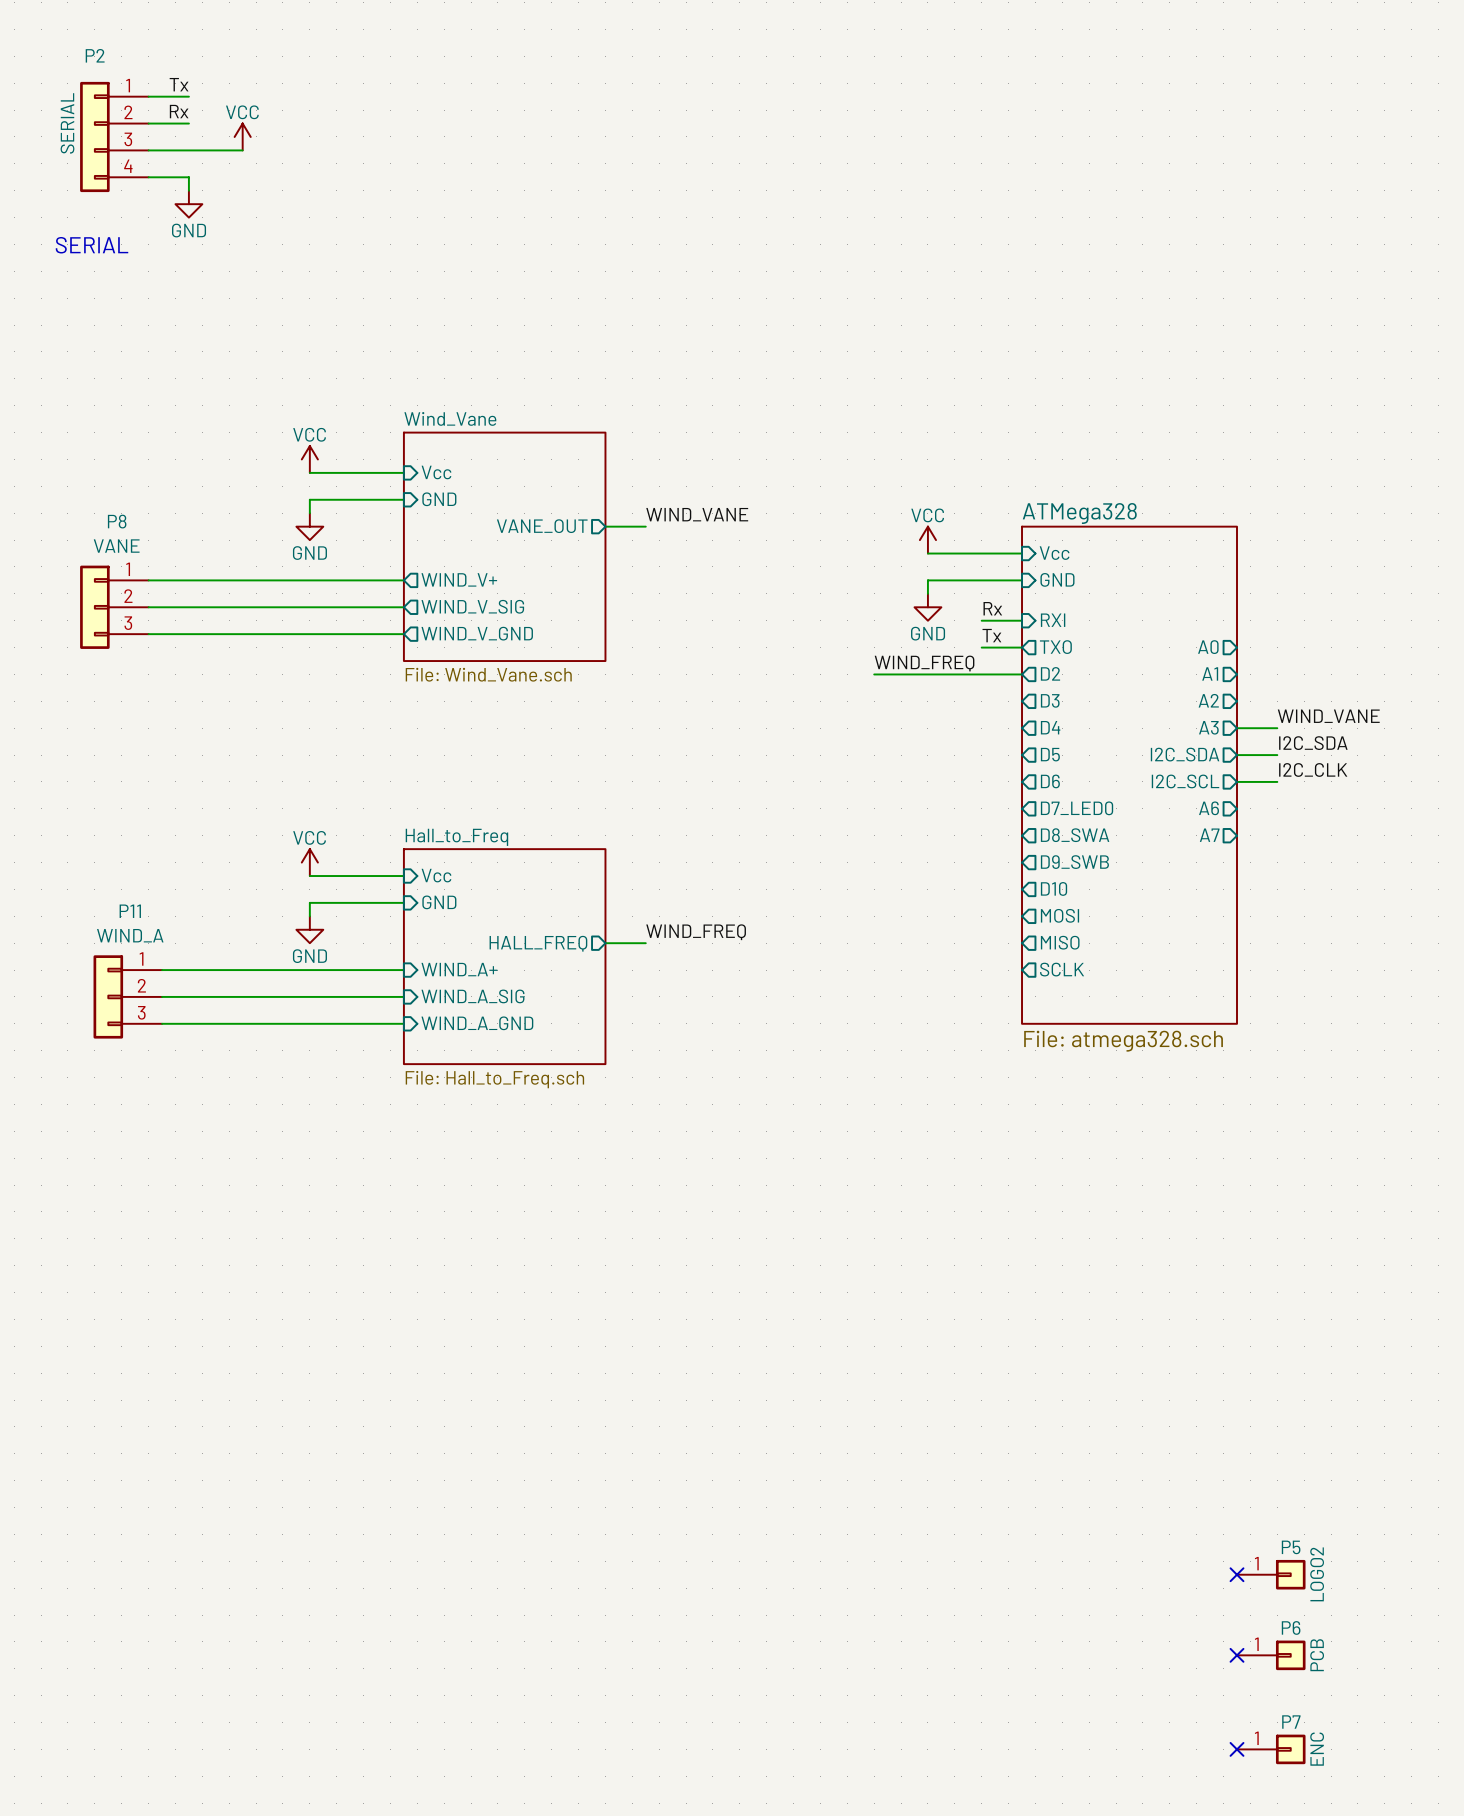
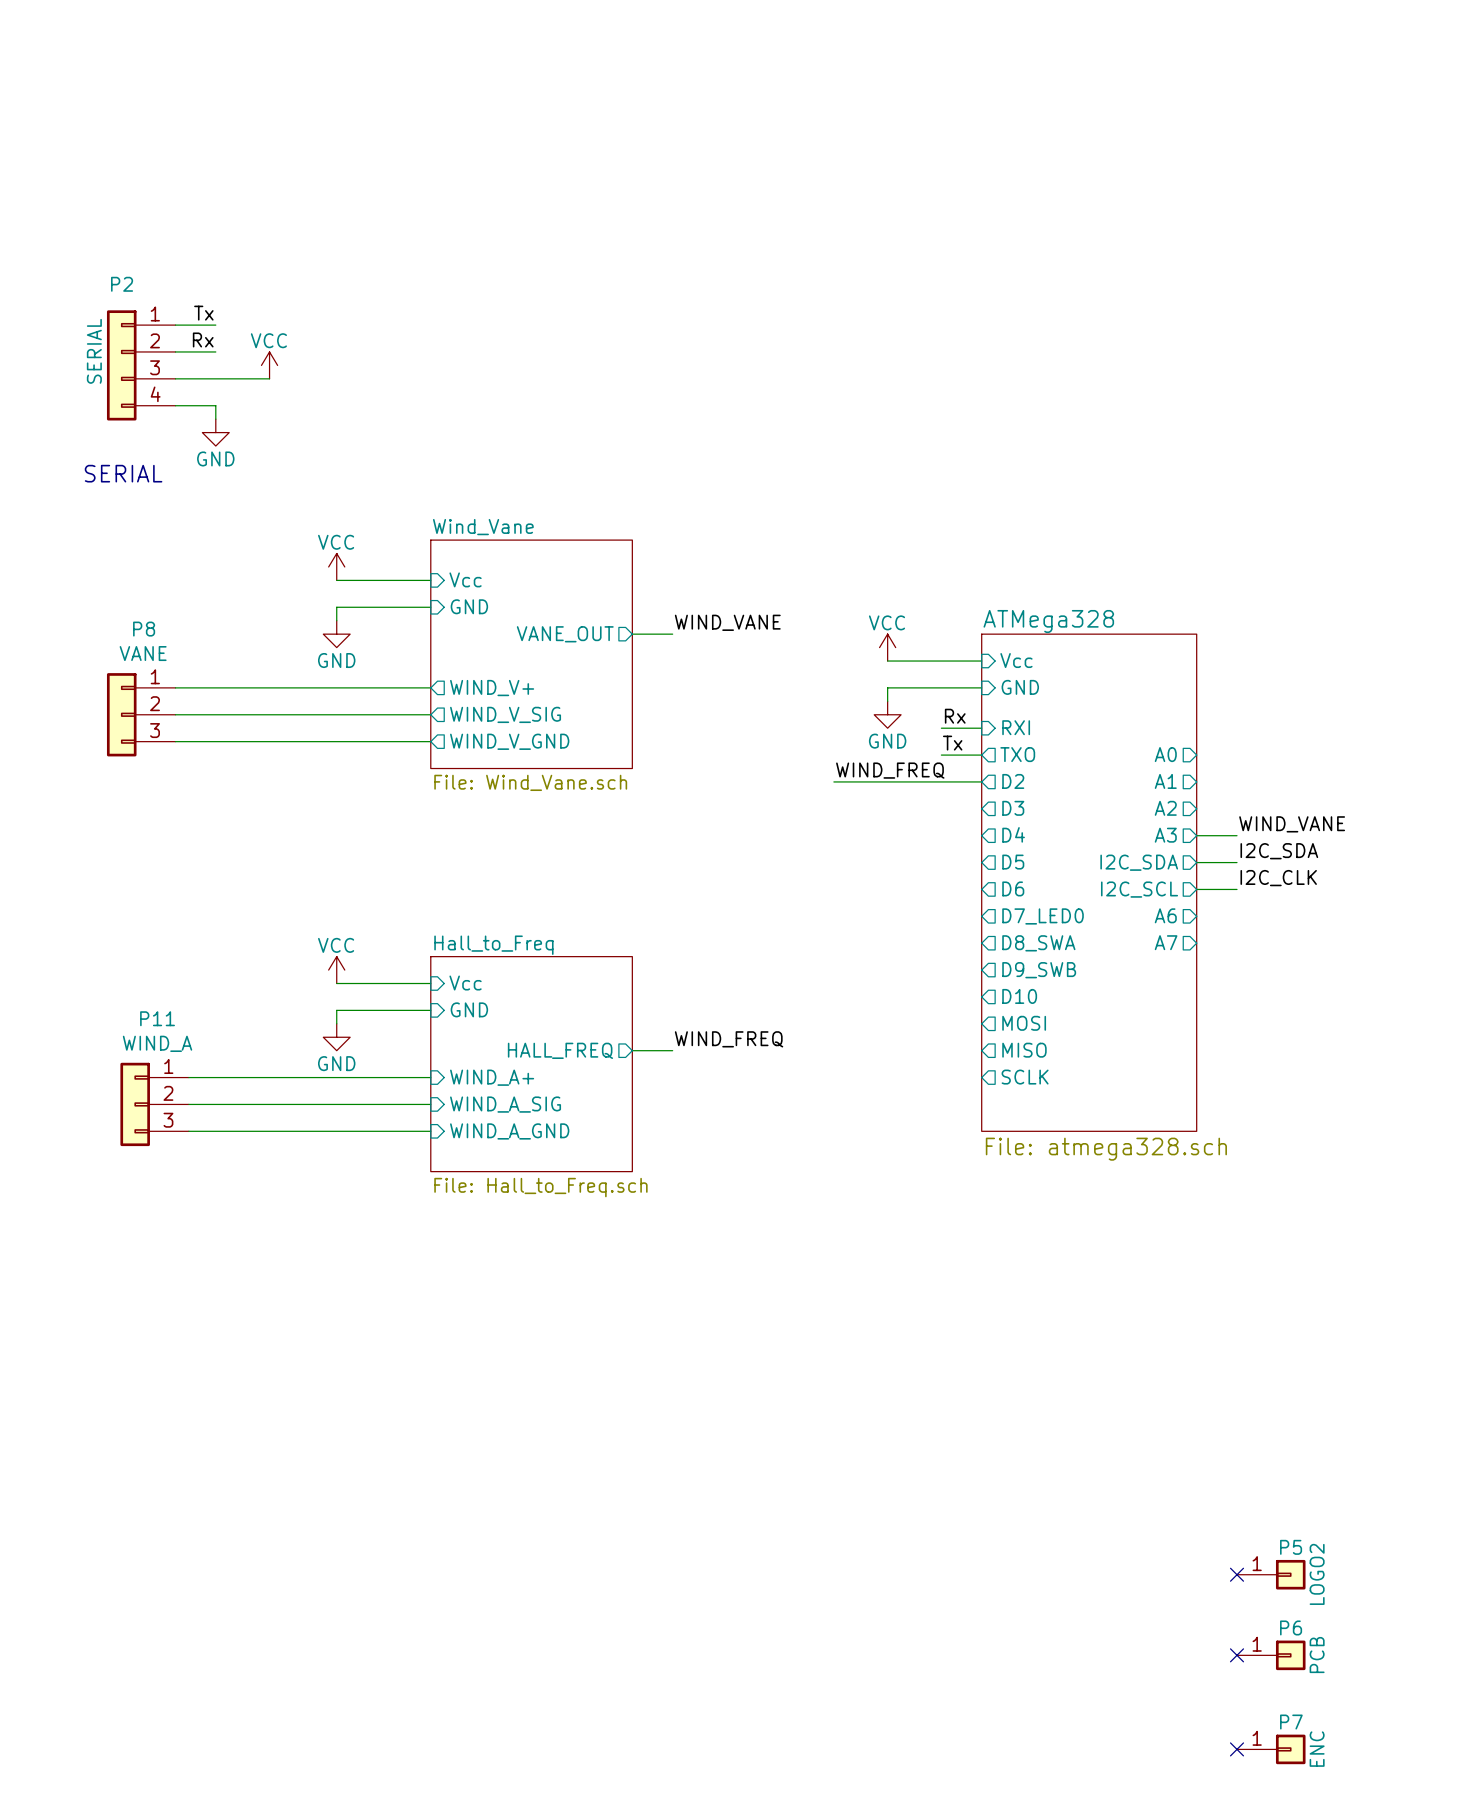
label position: Tx (179, 84) -> Tx (203, 313)
wire: (148, 96) (188, 96) -> (175, 325) (215, 325)
label position: Rx (179, 111) -> Rx (203, 339)
wire: (148, 123) (188, 123) -> (175, 351) (215, 351)
P2 position: (114, 136) -> (141, 365)
power symbol: VCC (242, 136) -> none
wire: (148, 150) (242, 150) -> (175, 378) (269, 378)
wire: (148, 177) (188, 177) (188, 190) -> (175, 405) (215, 405) (215, 419)
power symbol: GND (188, 204) -> none
text position: SERIAL (92, 245) -> SERIAL (123, 473)
power symbol: none -> VCC (269, 365)
power symbol: none -> GND (215, 432)
power symbol: VCC (309, 459) -> none
wire: (309, 472) (403, 472) -> none
sheet pin position: Vcc (436, 472) -> Vcc (465, 579)
wire: (403, 499) (309, 499) (309, 513) -> none
sheet pin position: GND (439, 499) -> GND (469, 606)
label position: WIND_VANE (697, 514) -> WIND_VANE (727, 622)
power symbol: GND (309, 526) -> none
sheet pin position: VANE_OUT (542, 526) -> VANE_OUT (565, 634)
wire: (605, 526) (645, 526) -> (632, 634) (672, 634)
power symbol position: VCC (927, 540) -> VCC (887, 647)
sheet Wind_Vane position: (504, 546) -> (531, 654)
wire: (927, 553) (1022, 553) -> (887, 661) (981, 661)
sheet pin position: Vcc (1054, 553) -> Vcc (1016, 660)
power symbol: none -> VCC (336, 566)
sheet pin position: WIND_V+ (459, 579) -> WIND_V+ (492, 688)
sheet pin position: GND (1057, 579) -> GND (1020, 687)
wire: (148, 580) (336, 580) -> none
wire: none -> (403, 580) (430, 580)
wire: (1022, 580) (927, 580) (927, 593) -> (981, 687) (887, 687) (887, 701)
sheet pin position: WIND_V_SIG (472, 606) -> WIND_V_SIG (505, 714)
P8 position: (114, 607) -> (141, 714)
wire: (148, 607) (336, 607) -> (336, 620) (336, 607)
wire: none -> (403, 607) (430, 607)
power symbol position: GND (927, 607) -> GND (887, 714)
label position: Rx (992, 608) -> Rx (955, 716)
wire: (981, 620) (1022, 620) -> (941, 728) (981, 728)
sheet pin position: RXI (1053, 620) -> RXI (1016, 727)
sheet pin position: WIND_V_GND (477, 633) -> WIND_V_GND (509, 741)
wire: (148, 634) (403, 634) -> (175, 741) (430, 741)
power symbol: none -> GND (336, 634)
label position: Tx (991, 635) -> Tx (952, 743)
wire: (981, 647) (1022, 647) -> (941, 755) (981, 755)
sheet pin position: TXO (1055, 647) -> TXO (1017, 754)
sheet pin position: A0 (1208, 647) -> A0 (1165, 754)
label position: WIND_FREQ (924, 663) -> WIND_FREQ (890, 770)
sheet pin position: D2 (1050, 673) -> D2 (1013, 781)
sheet pin position: A1 (1210, 673) -> A1 (1165, 781)
wire: (874, 674) (1022, 674) -> (833, 781) (981, 781)
wire: none -> (175, 687) (430, 687)
sheet pin position: D3 (1050, 700) -> D3 (1013, 808)
sheet pin position: A2 (1208, 700) -> A2 (1165, 808)
wire: none -> (175, 714) (430, 714)
label position: WIND_VANE (1328, 716) -> WIND_VANE (1292, 824)
sheet pin position: D4 (1050, 727) -> D4 (1013, 834)
sheet pin position: A3 (1208, 727) -> A3 (1165, 835)
wire: (1237, 728) (1277, 728) -> (1196, 835) (1237, 835)
label position: I2C_SDA (1313, 743) -> I2C_SDA (1279, 851)
sheet pin position: D5 (1050, 754) -> D5 (1013, 862)
sheet pin position: I2C_SDA (1185, 754) -> I2C_SDA (1139, 862)
wire: (1237, 755) (1277, 755) -> (1196, 862) (1237, 862)
label position: I2C_CLK (1313, 769) -> I2C_CLK (1278, 878)
sheet ATMega328 position: (1129, 775) -> (1089, 882)
sheet pin position: D6 (1050, 781) -> D6 (1013, 888)
sheet pin position: I2C_SCL (1185, 781) -> I2C_SCL (1139, 889)
wire: (1237, 781) (1277, 781) -> (1196, 889) (1237, 889)
sheet pin position: D7_LED0 (1077, 808) -> D7_LED0 (1043, 916)
sheet pin position: A6 (1209, 808) -> A6 (1165, 915)
sheet pin position: D8_SWA (1075, 835) -> D8_SWA (1038, 943)
sheet pin position: A7 (1209, 835) -> A7 (1166, 942)
power symbol position: VCC (309, 862) -> VCC (336, 970)
sheet pin position: D9_SWB (1074, 862) -> D9_SWB (1039, 970)
sheet pin position: Vcc (436, 875) -> Vcc (465, 983)
wire: (309, 876) (403, 876) -> (336, 983) (430, 983)
sheet pin position: D10 (1054, 888) -> D10 (1019, 996)
wire: (403, 902) (309, 902) (309, 916) -> (430, 1010) (336, 1010) (336, 1023)
sheet pin position: GND (439, 902) -> GND (469, 1009)
sheet pin position: MOSI (1060, 915) -> MOSI (1024, 1023)
power symbol position: GND (309, 929) -> GND (336, 1037)
label position: WIND_FREQ (696, 932) -> WIND_FREQ (729, 1039)
sheet pin position: MISO (1060, 942) -> MISO (1024, 1050)
sheet pin position: HALL_FREQ (538, 943) -> HALL_FREQ (560, 1050)
wire: (605, 943) (645, 943) -> (632, 1050) (672, 1050)
sheet Hall_to_Freq position: (504, 956) -> (531, 1064)
sheet pin position: WIND_A+ (459, 969) -> WIND_A+ (492, 1077)
sheet pin position: SCLK (1062, 969) -> SCLK (1025, 1077)
wire: (162, 970) (403, 970) -> (188, 1077) (430, 1077)
P11 position: (127, 996) -> (154, 1104)
wire: (162, 996) (403, 996) -> (188, 1104) (430, 1104)
sheet pin position: WIND_A_SIG (472, 996) -> WIND_A_SIG (505, 1104)
wire: (162, 1023) (403, 1023) -> (188, 1131) (430, 1131)
sheet pin position: WIND_A_GND (477, 1023) -> WIND_A_GND (509, 1131)

